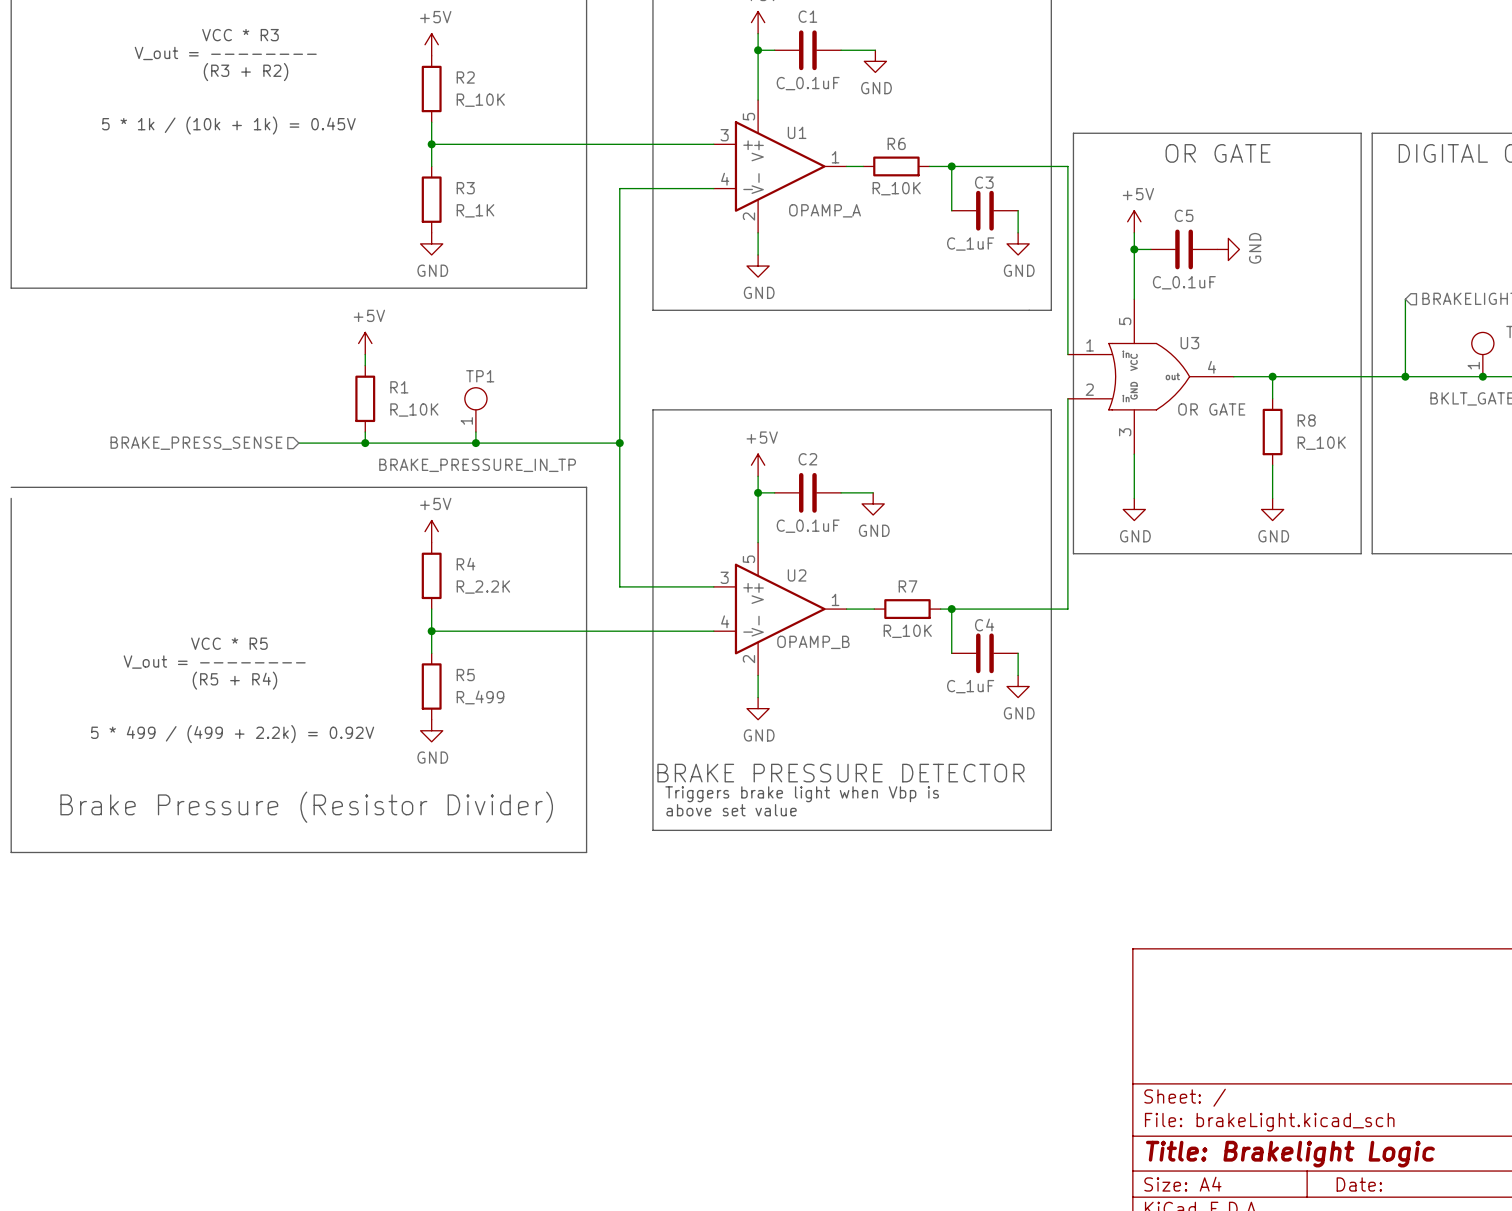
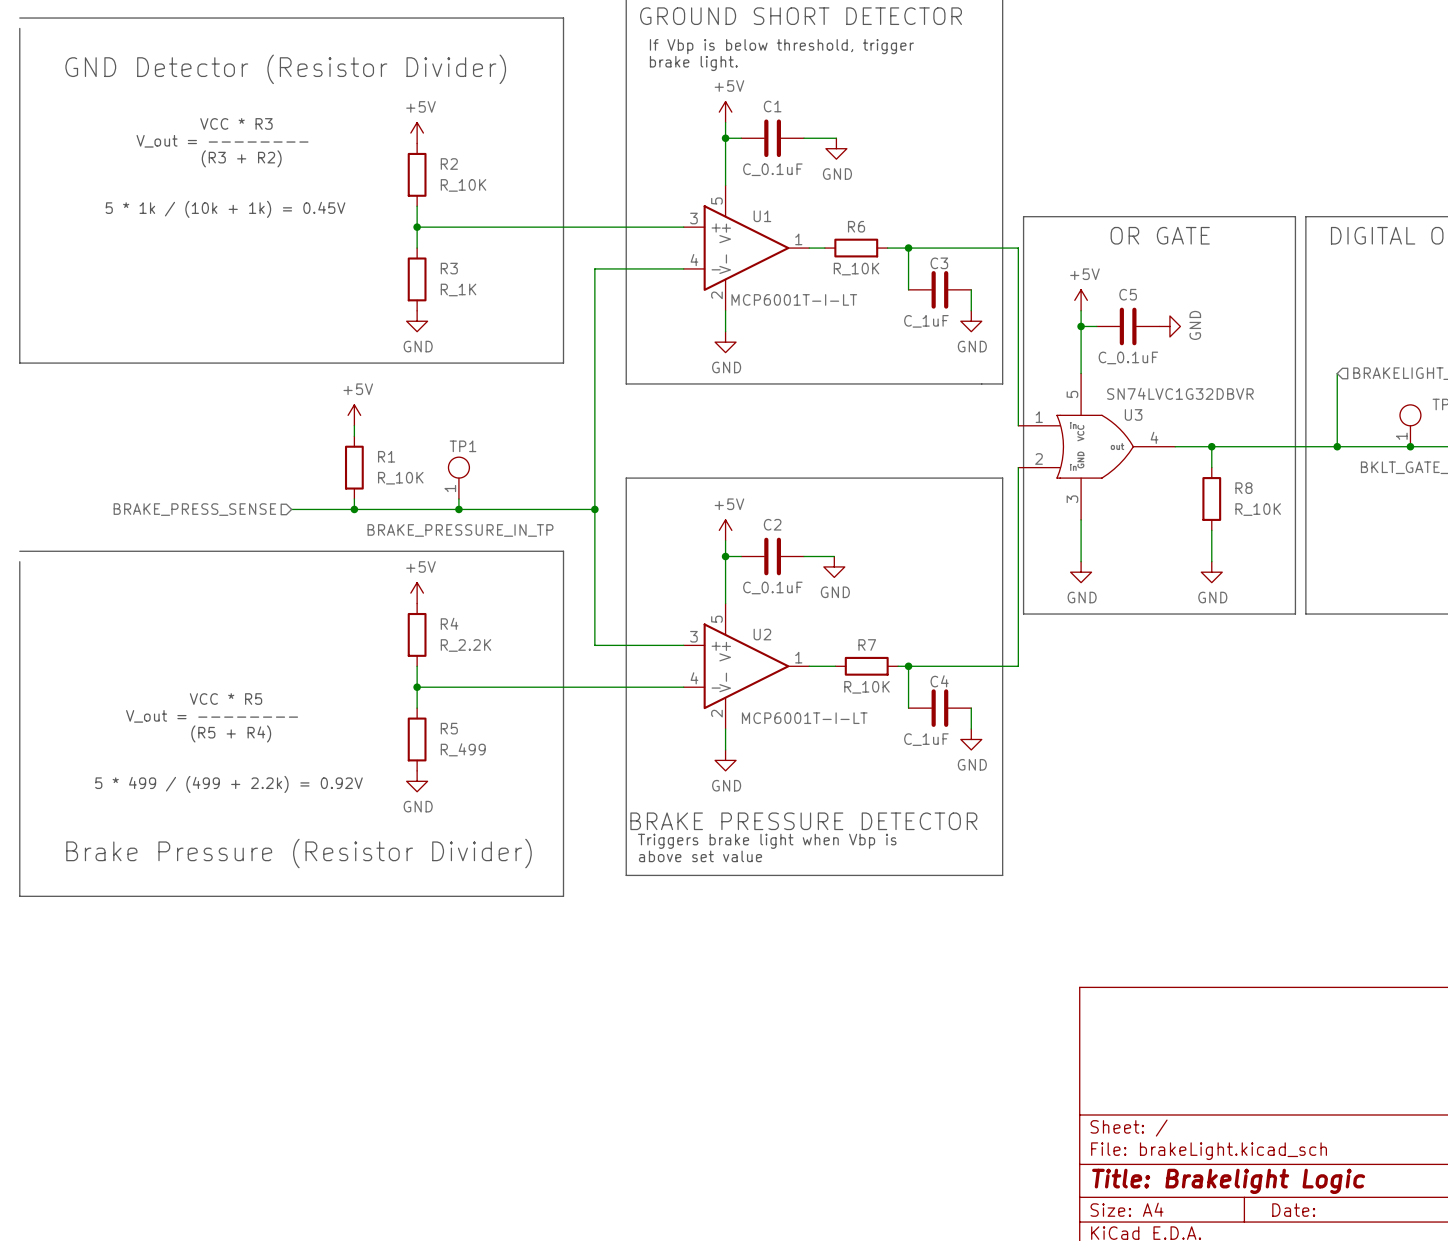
U1 value: OPAMP_A (825, 210) -> MCP6001T-I-LT (794, 299)
U3 value: OR GATE (1211, 409) -> SN74LVC1G32DBVR (1180, 393)
U2 value: OPAMP_B (813, 642) -> MCP6001T-I-LT (804, 718)

